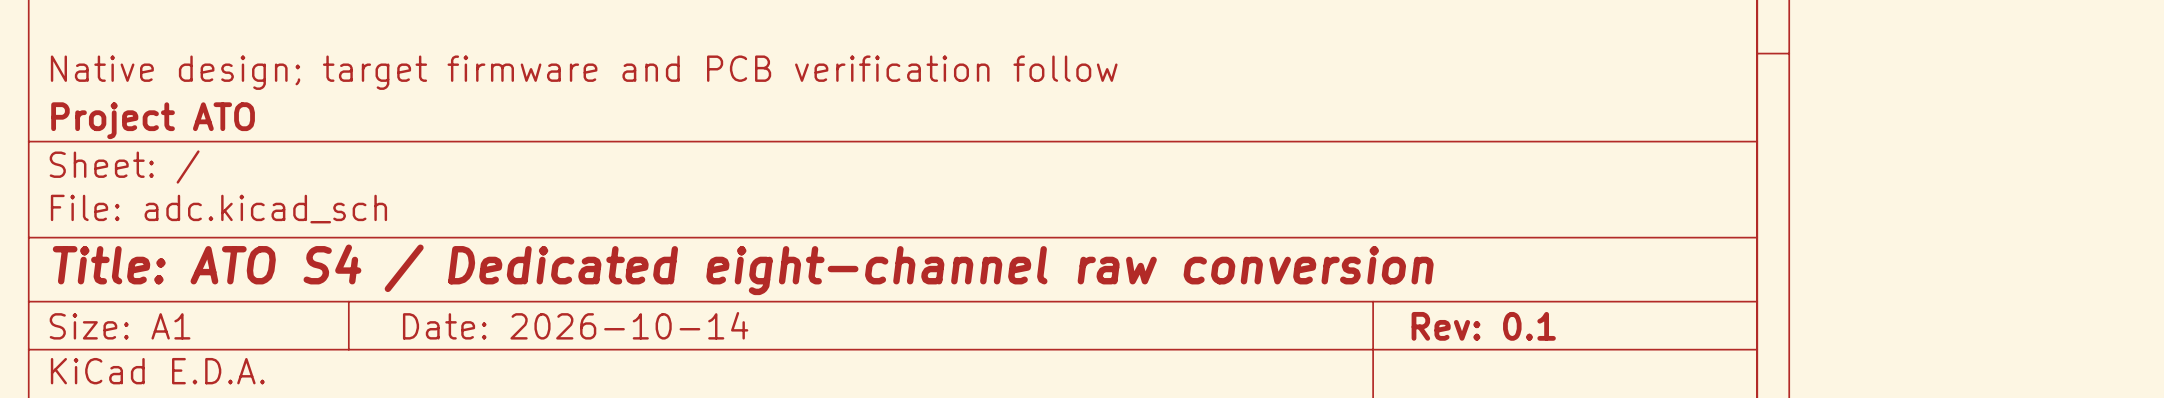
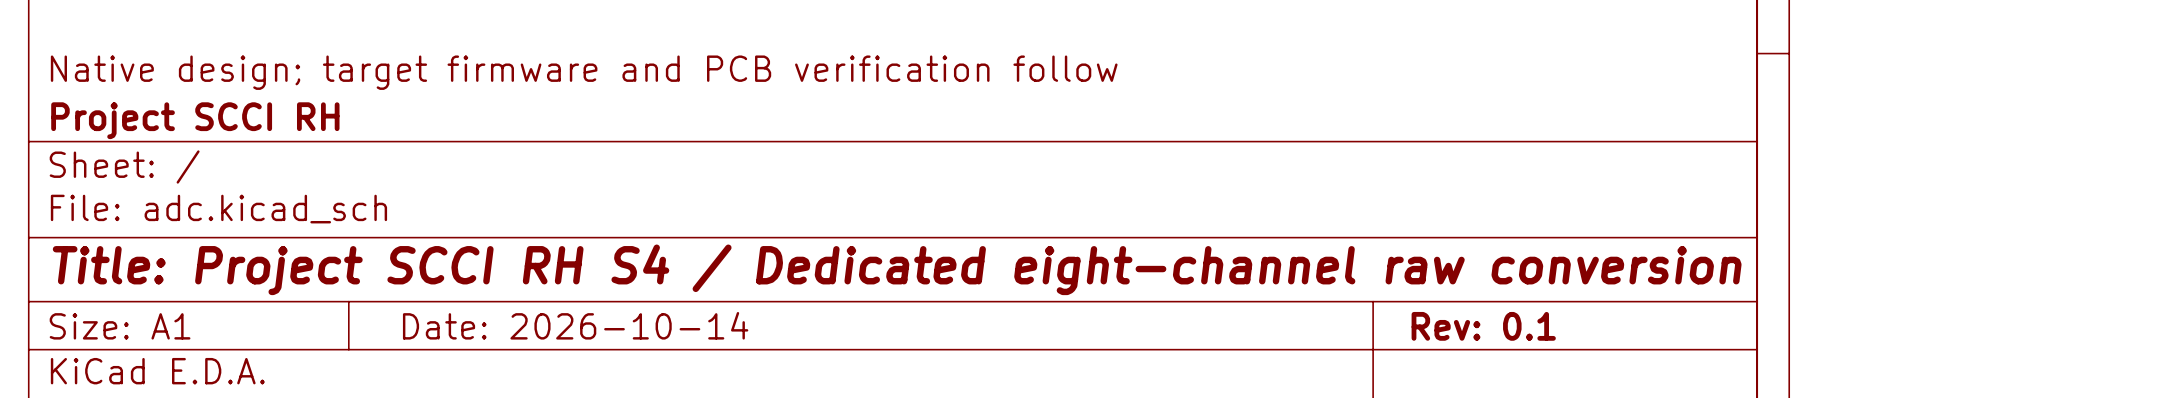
title block: Project ATO (153, 120) -> Project SCCI RH (195, 120)
title block: Title: ATO S4 / Dedicated eight-channel raw conversion (743, 269) -> Title: Project SCCI RH S4 / Dedicated eight-channel raw conversion (897, 269)

